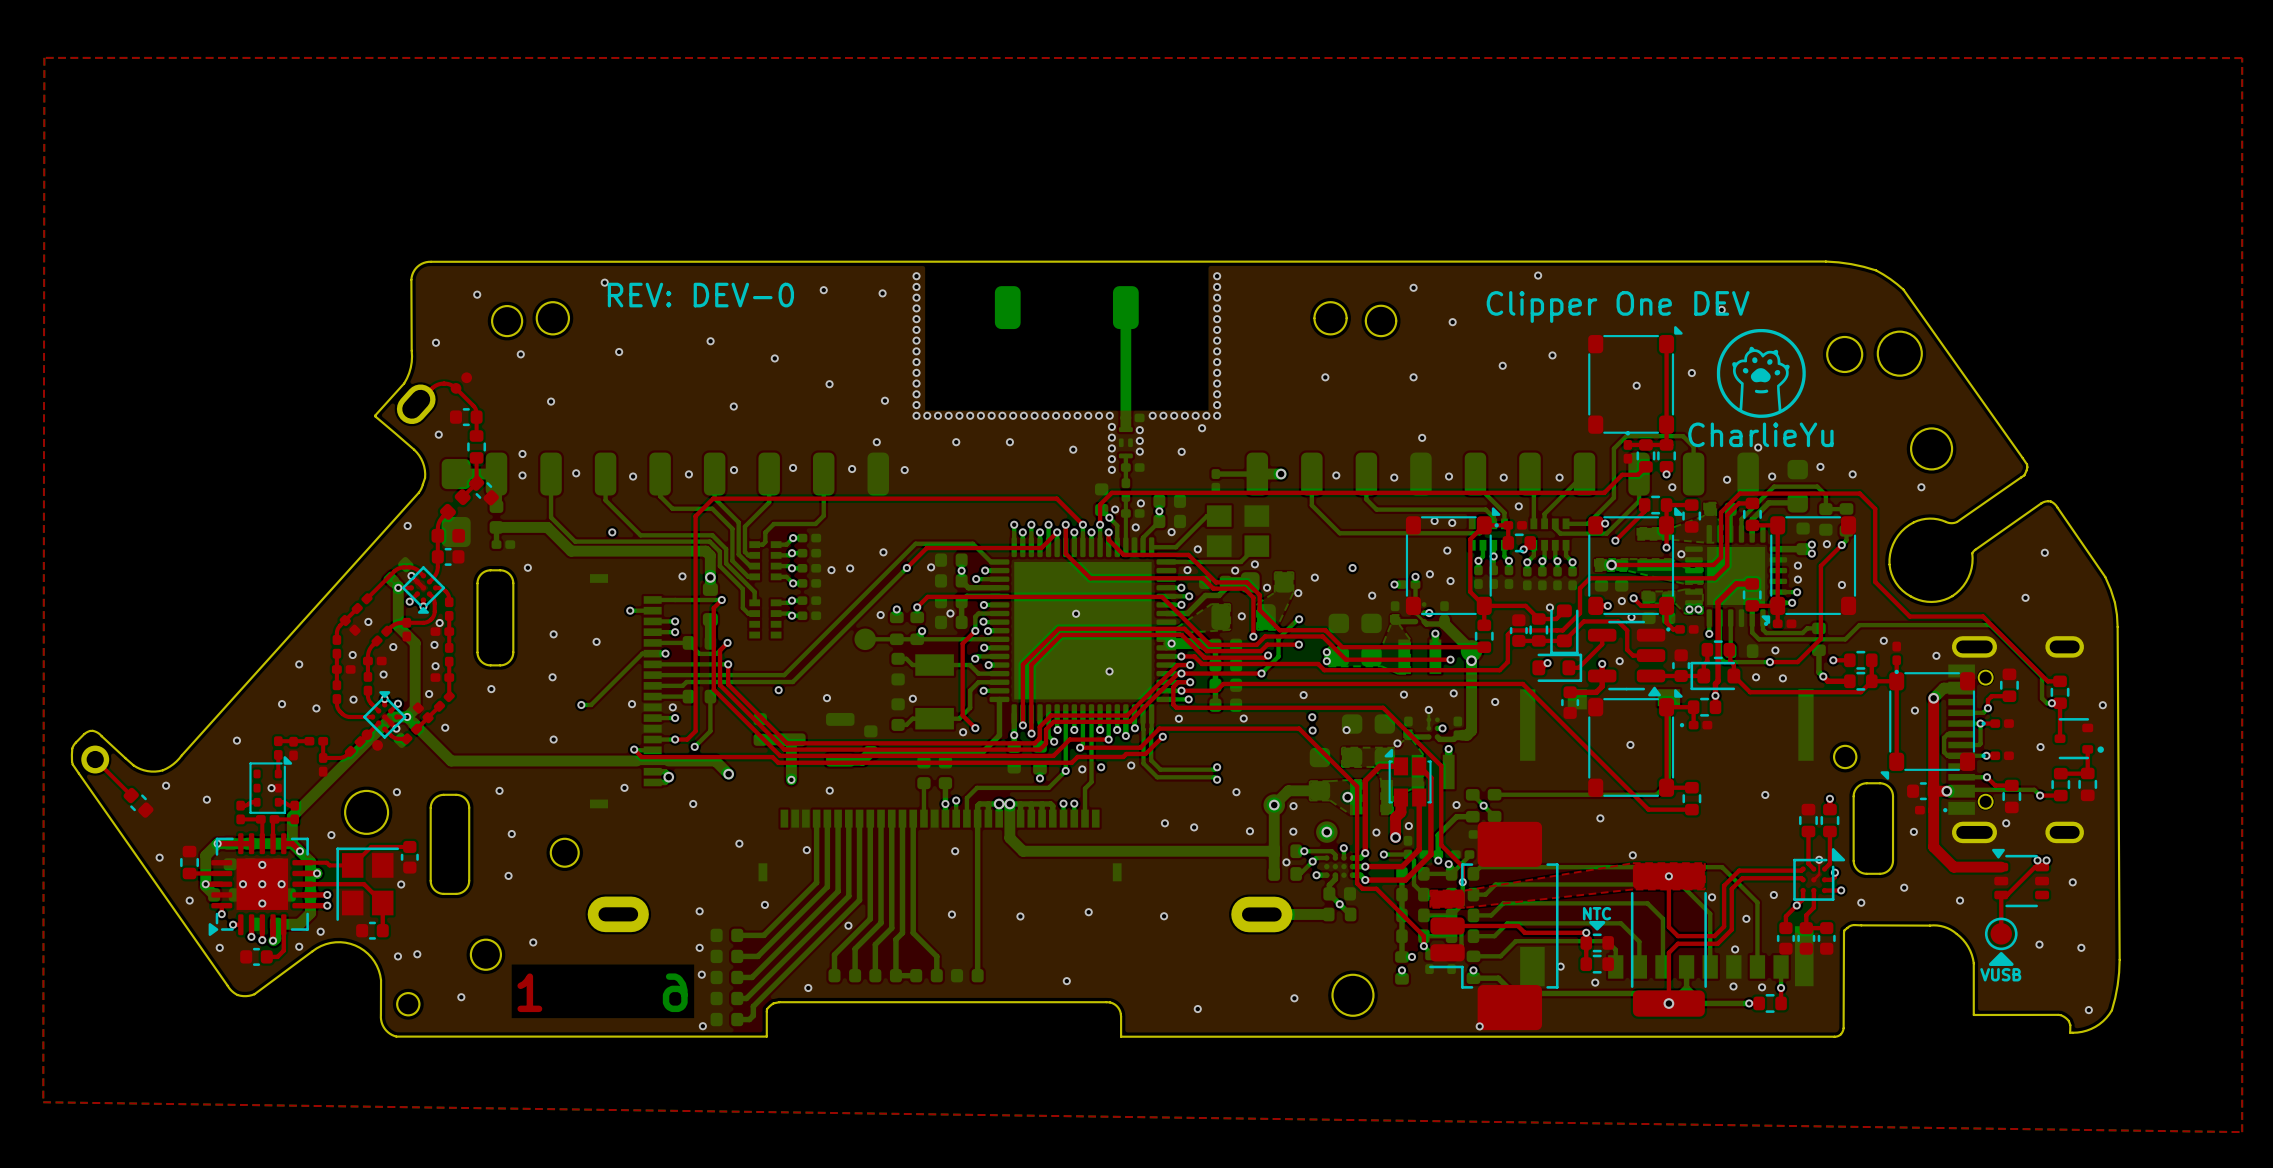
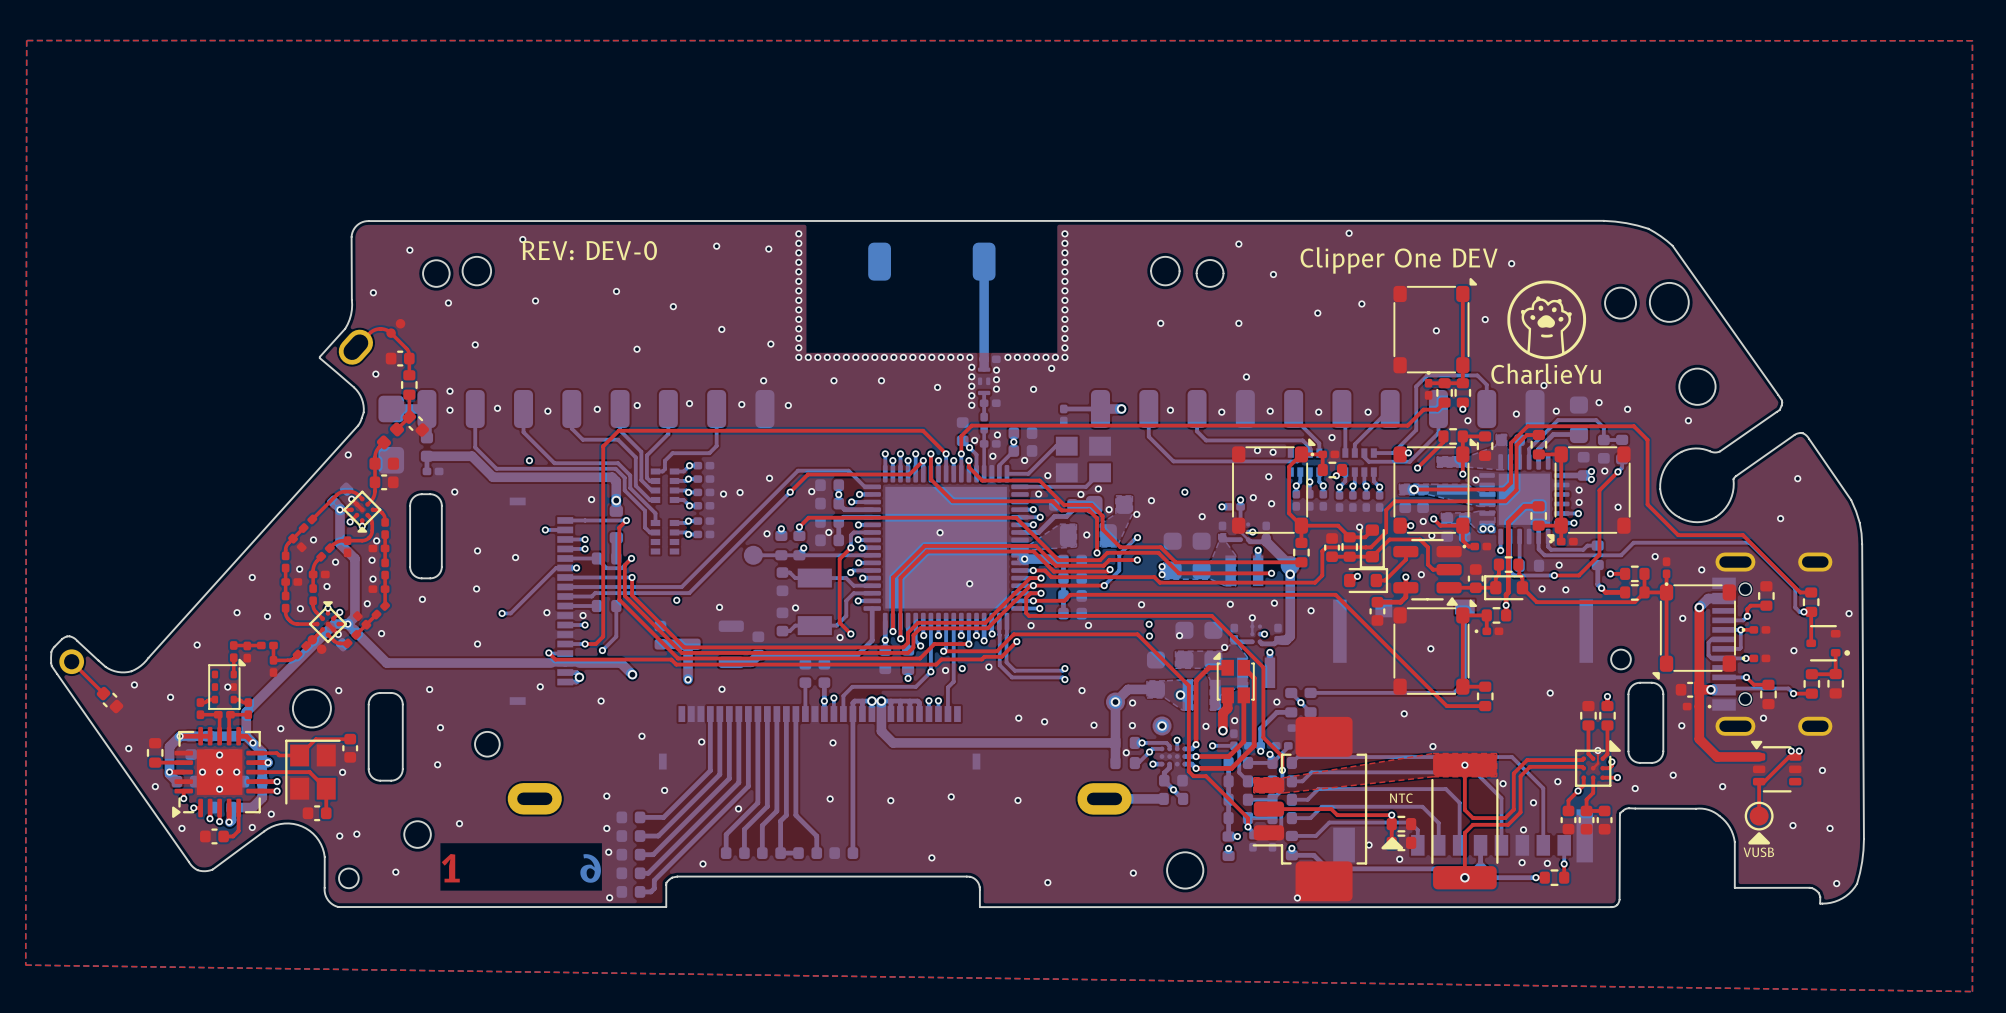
drawing: [1589, 920, 1606, 931] -> none
drawing: none -> [1381, 837, 1404, 850]

